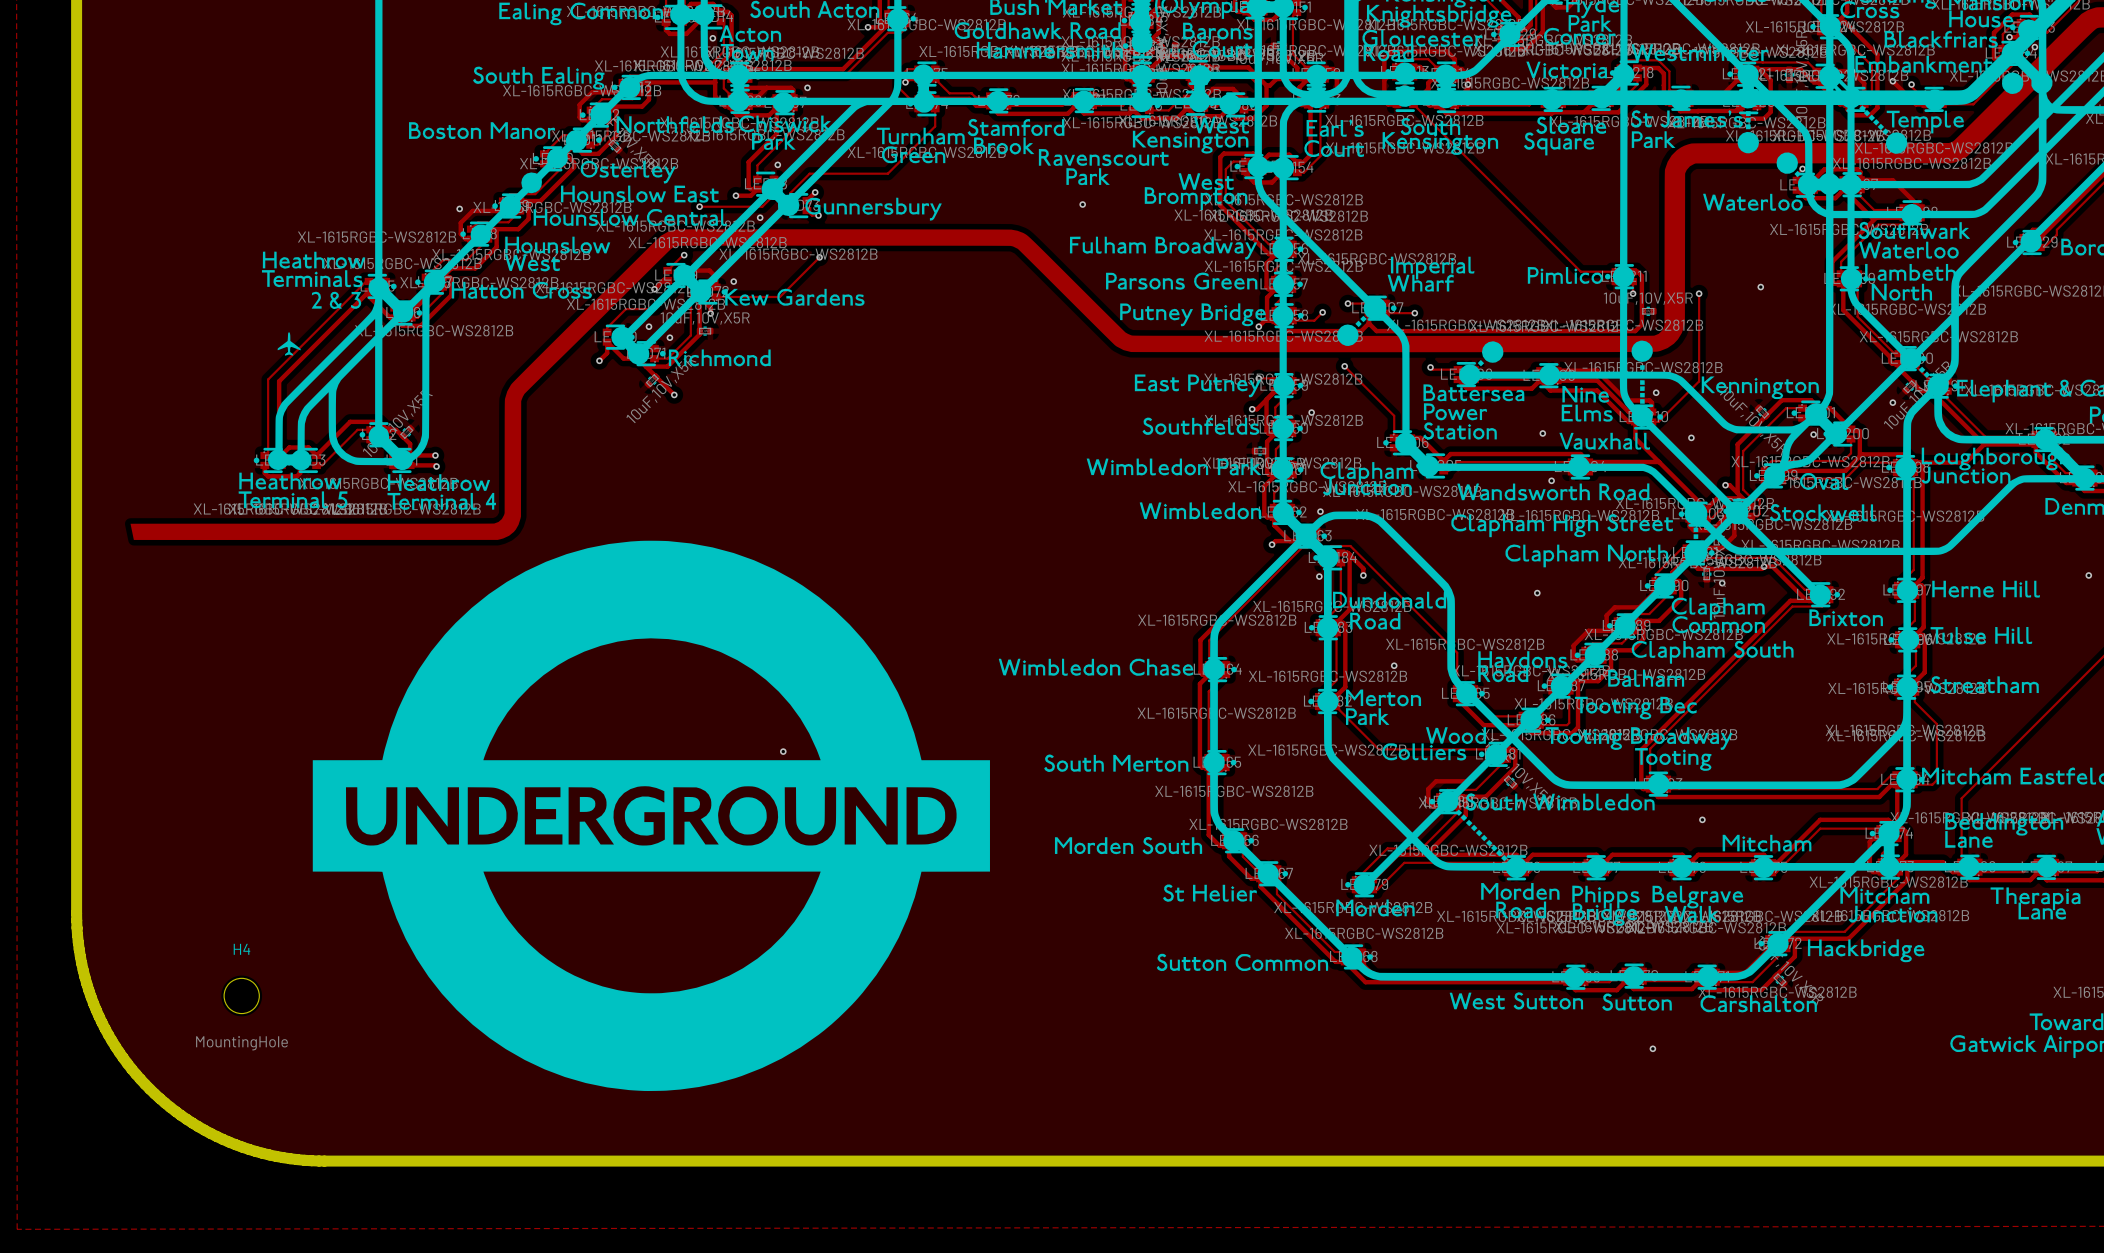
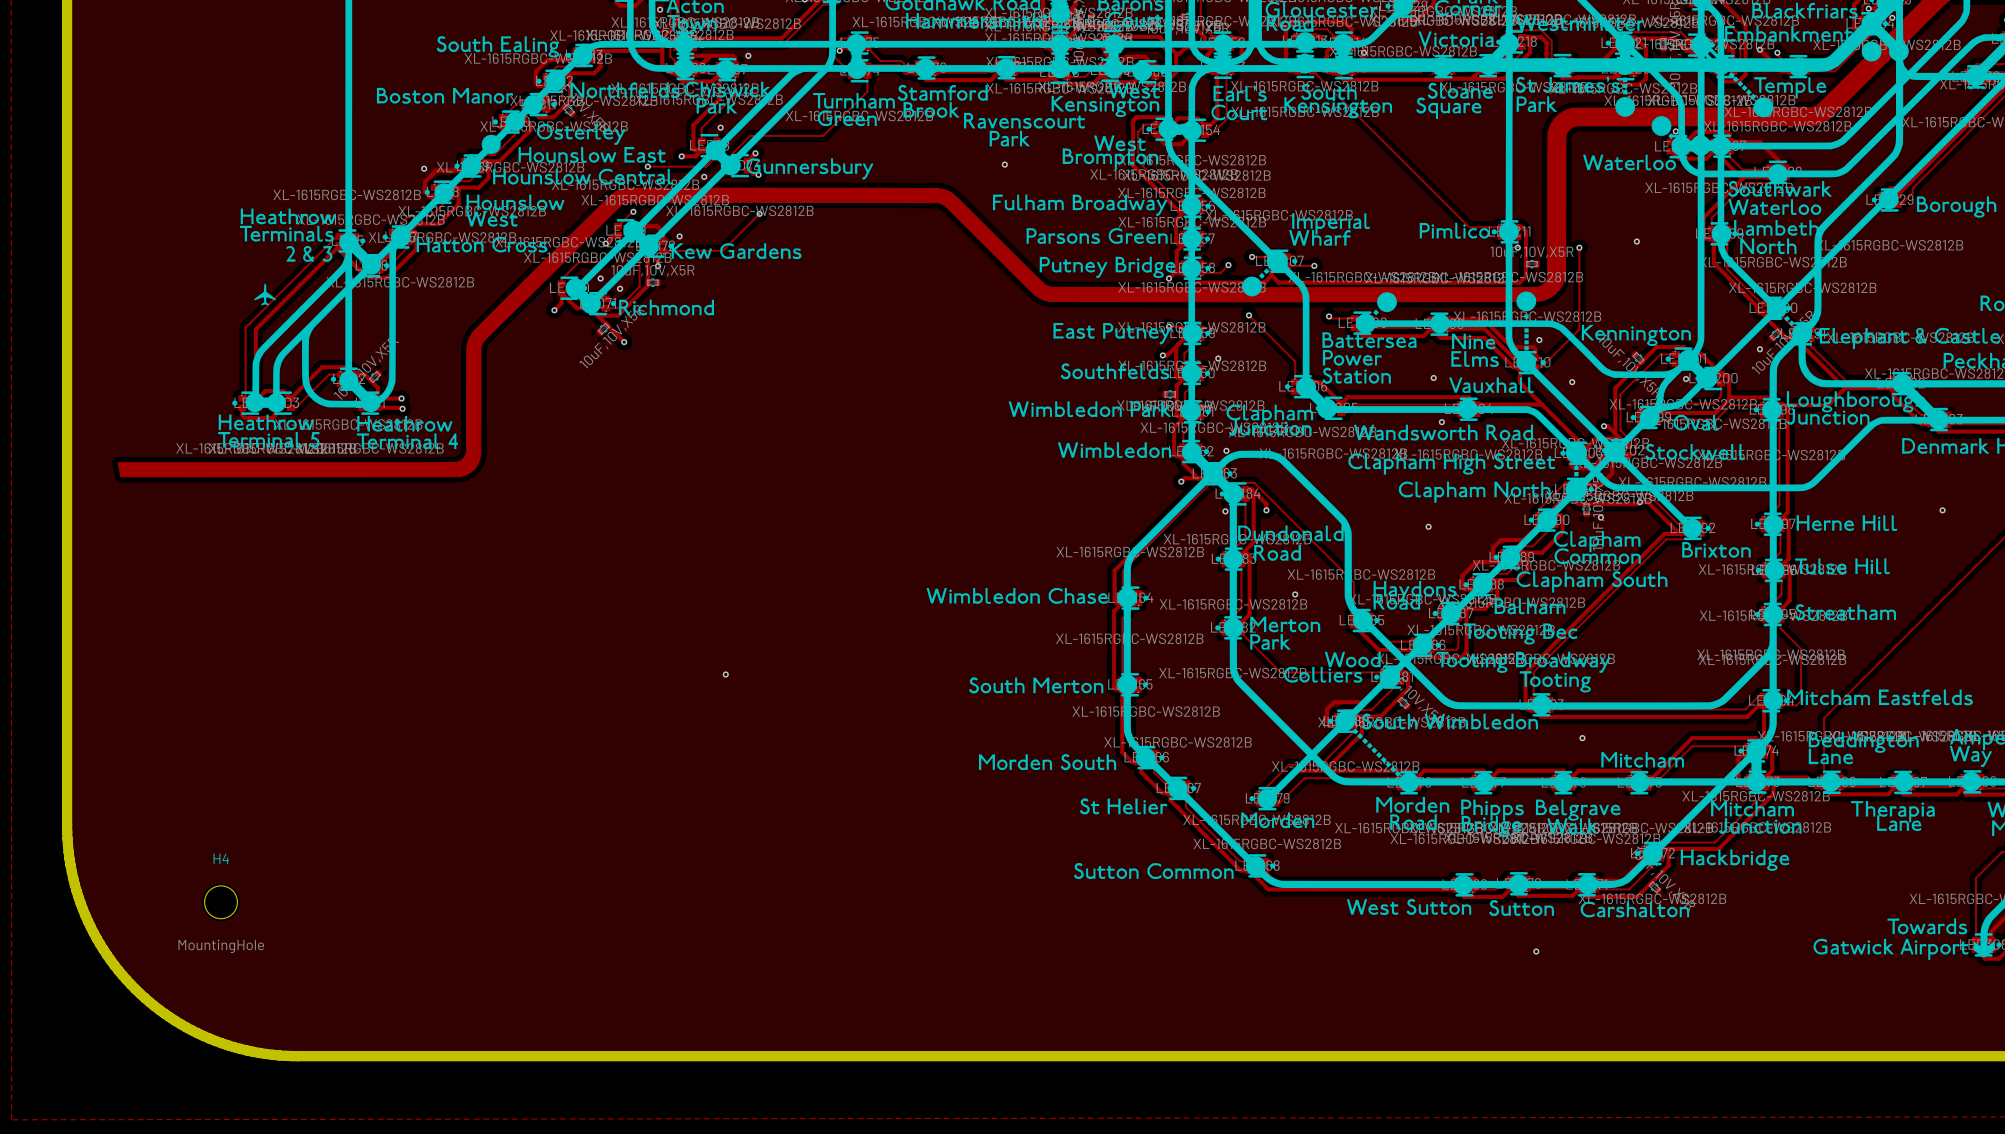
drawing: [312, 540, 990, 1092] -> none

